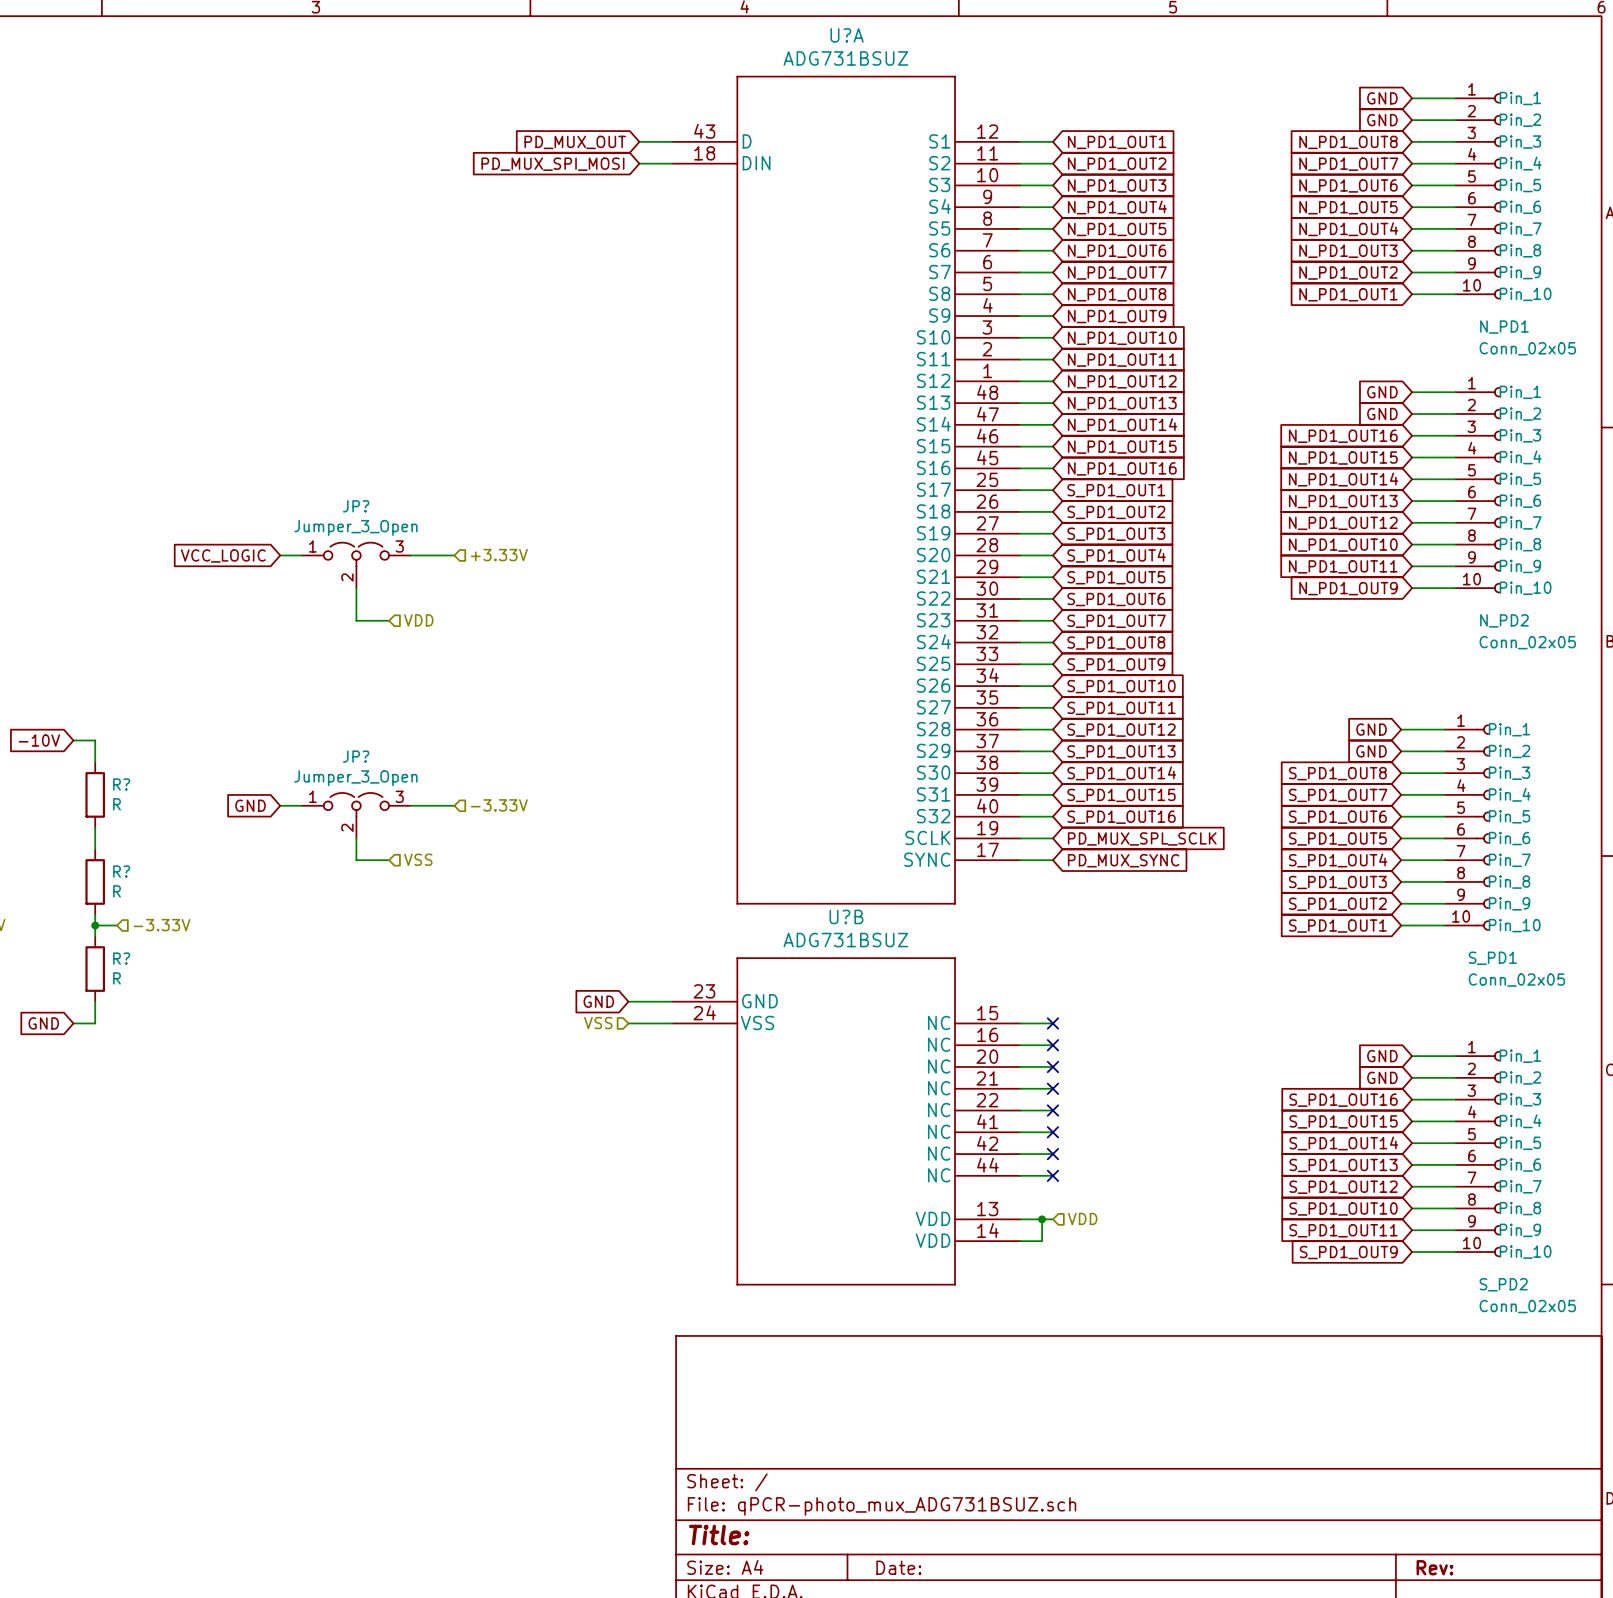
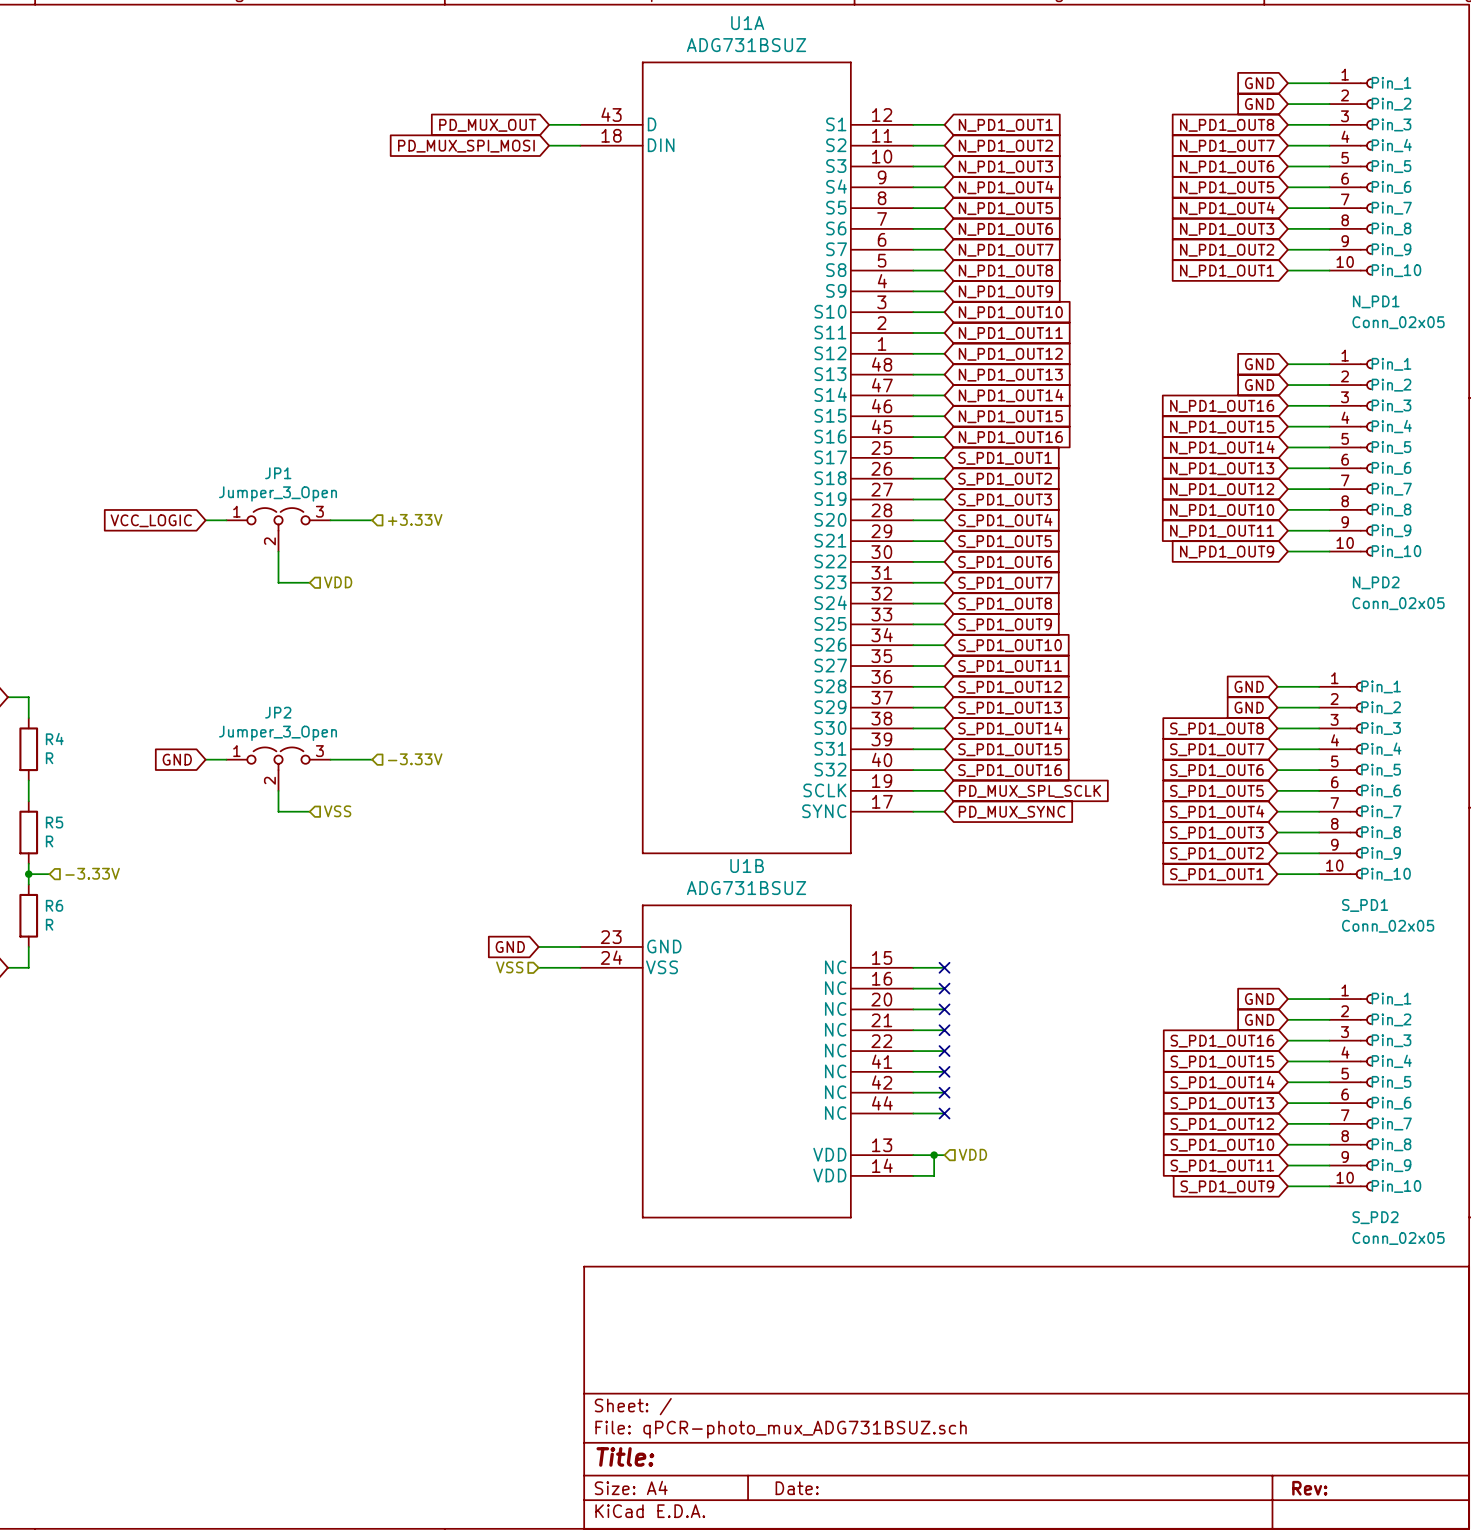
U?A name: U?A (847, 35) -> U1A (747, 23)
JP? name: JP? (356, 506) -> JP1 (278, 473)
JP? name: JP? (356, 756) -> JP2 (278, 712)
R? name: R? (121, 784) -> R4 (54, 739)
R? name: R? (121, 871) -> R5 (54, 822)
U?B name: U?B (846, 916) -> U1B (747, 865)
R? name: R? (121, 958) -> R6 (54, 905)

